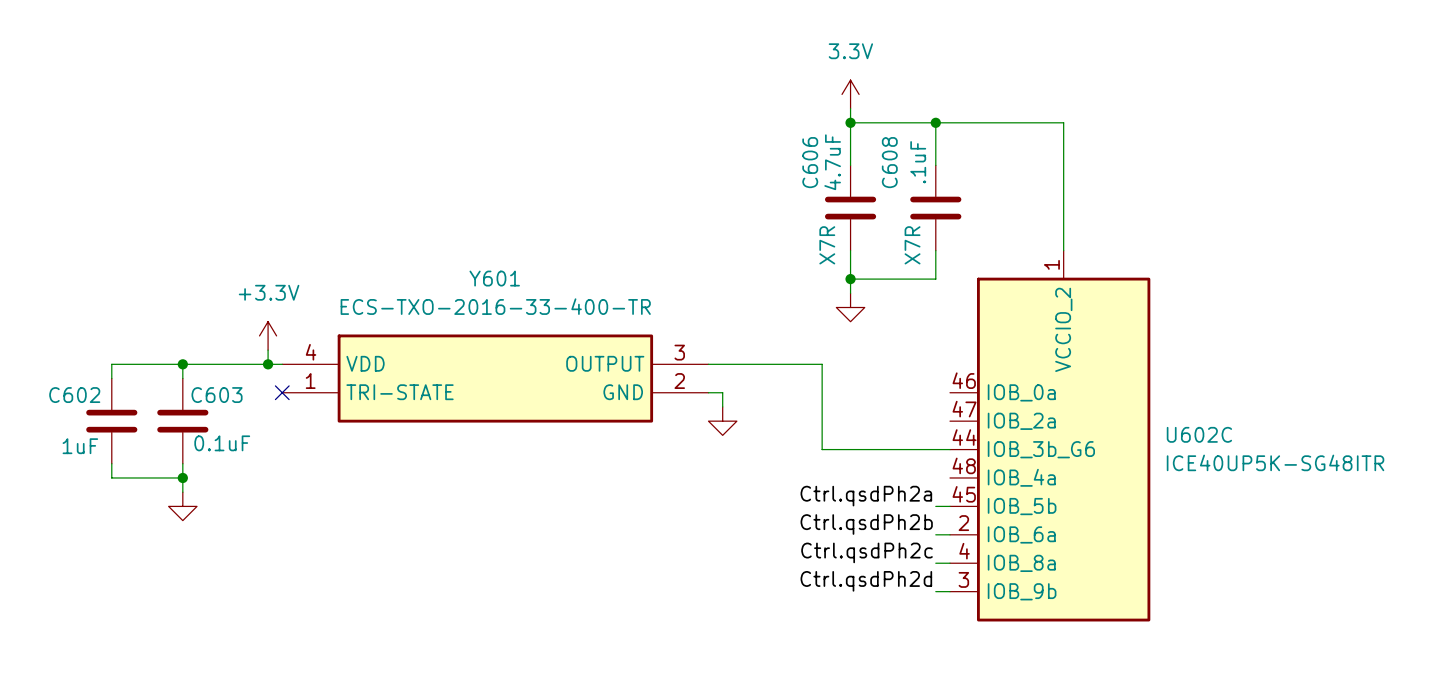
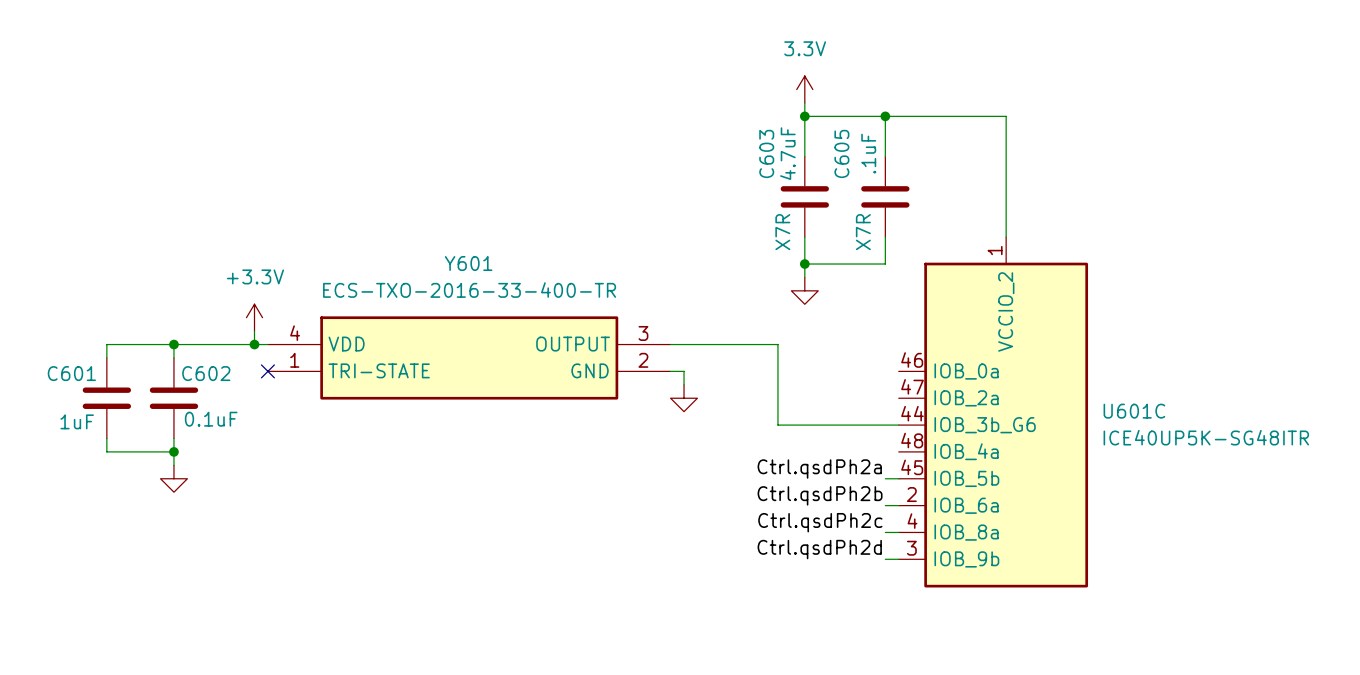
C606 name: C606 (810, 162) -> C603 (766, 153)
C608 name: C608 (889, 162) -> C605 (841, 153)
C602 name: C602 (74, 395) -> C601 (71, 373)
C603 name: C603 (217, 395) -> C602 (206, 373)
U602C name: U602C (1199, 434) -> U601C (1134, 411)

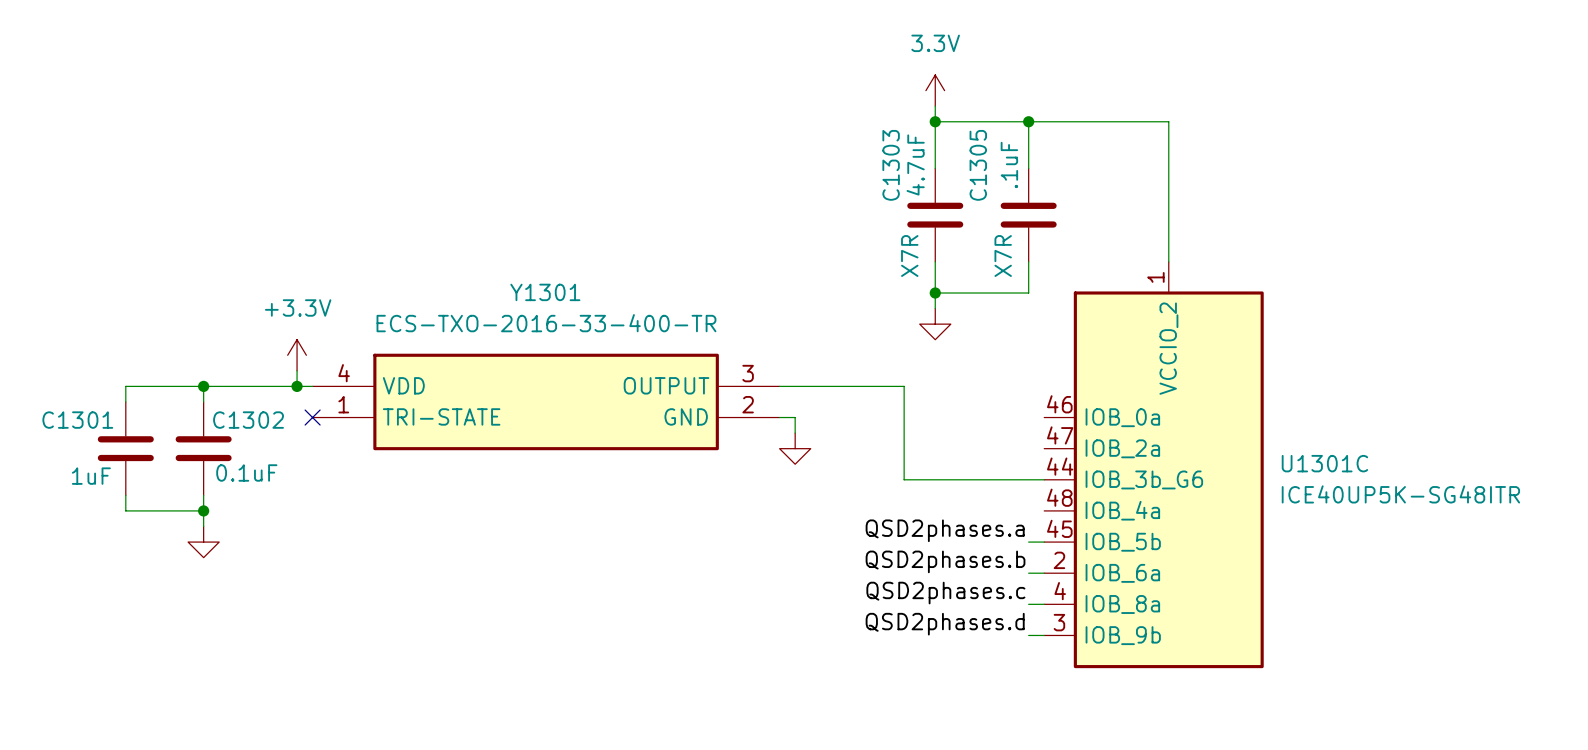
C603 name: C603 (766, 153) -> C1303 (891, 165)
C605 name: C605 (841, 153) -> C1305 (978, 165)
Y601 name: Y601 (468, 263) -> Y1301 (545, 292)
C601 name: C601 (71, 373) -> C1301 (77, 420)
C602 name: C602 (206, 373) -> C1302 (248, 420)
U601C name: U601C (1134, 411) -> U1301C (1324, 463)
label: Ctrl.qsdPh2a (819, 469) -> QSD2phases.a (945, 530)
label: Ctrl.qsdPh2b (820, 495) -> QSD2phases.b (945, 561)
label: Ctrl.qsdPh2c (820, 522) -> QSD2phases.c (945, 593)
label: Ctrl.qsdPh2d (819, 549) -> QSD2phases.d (945, 624)

